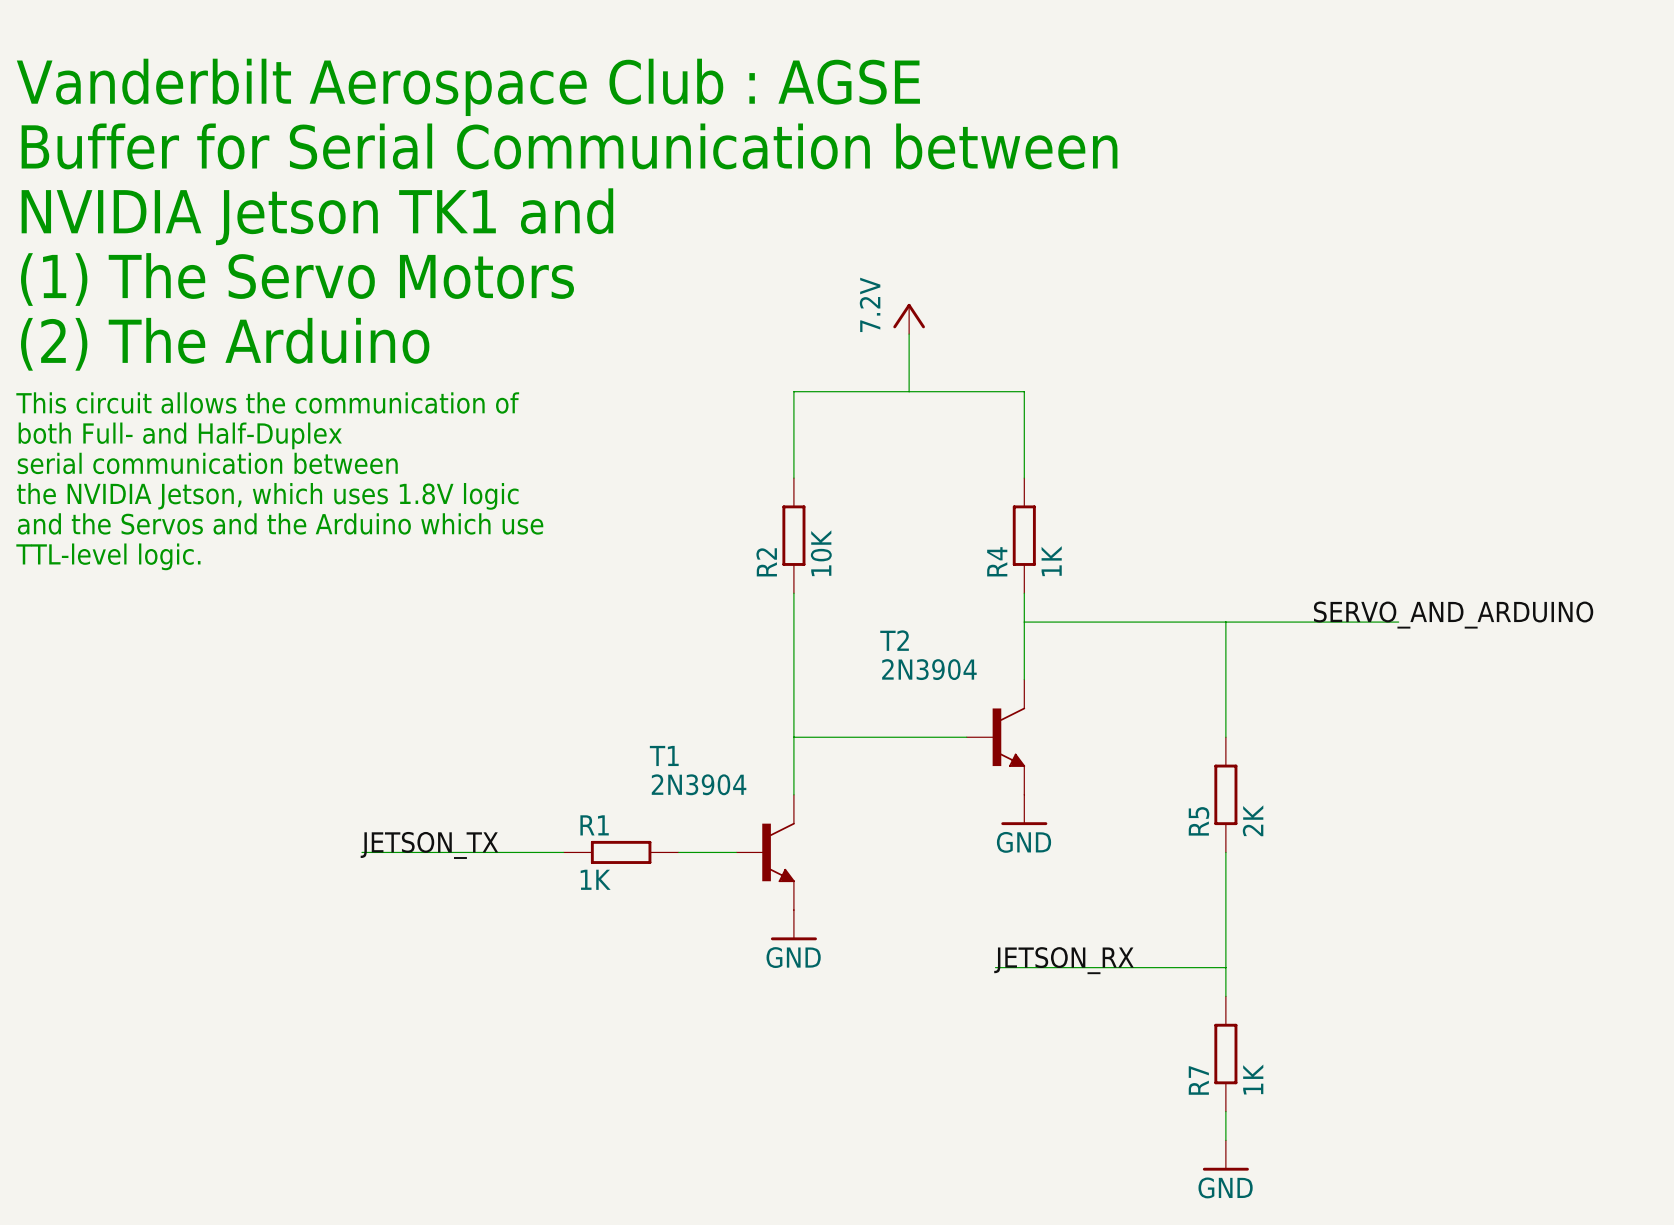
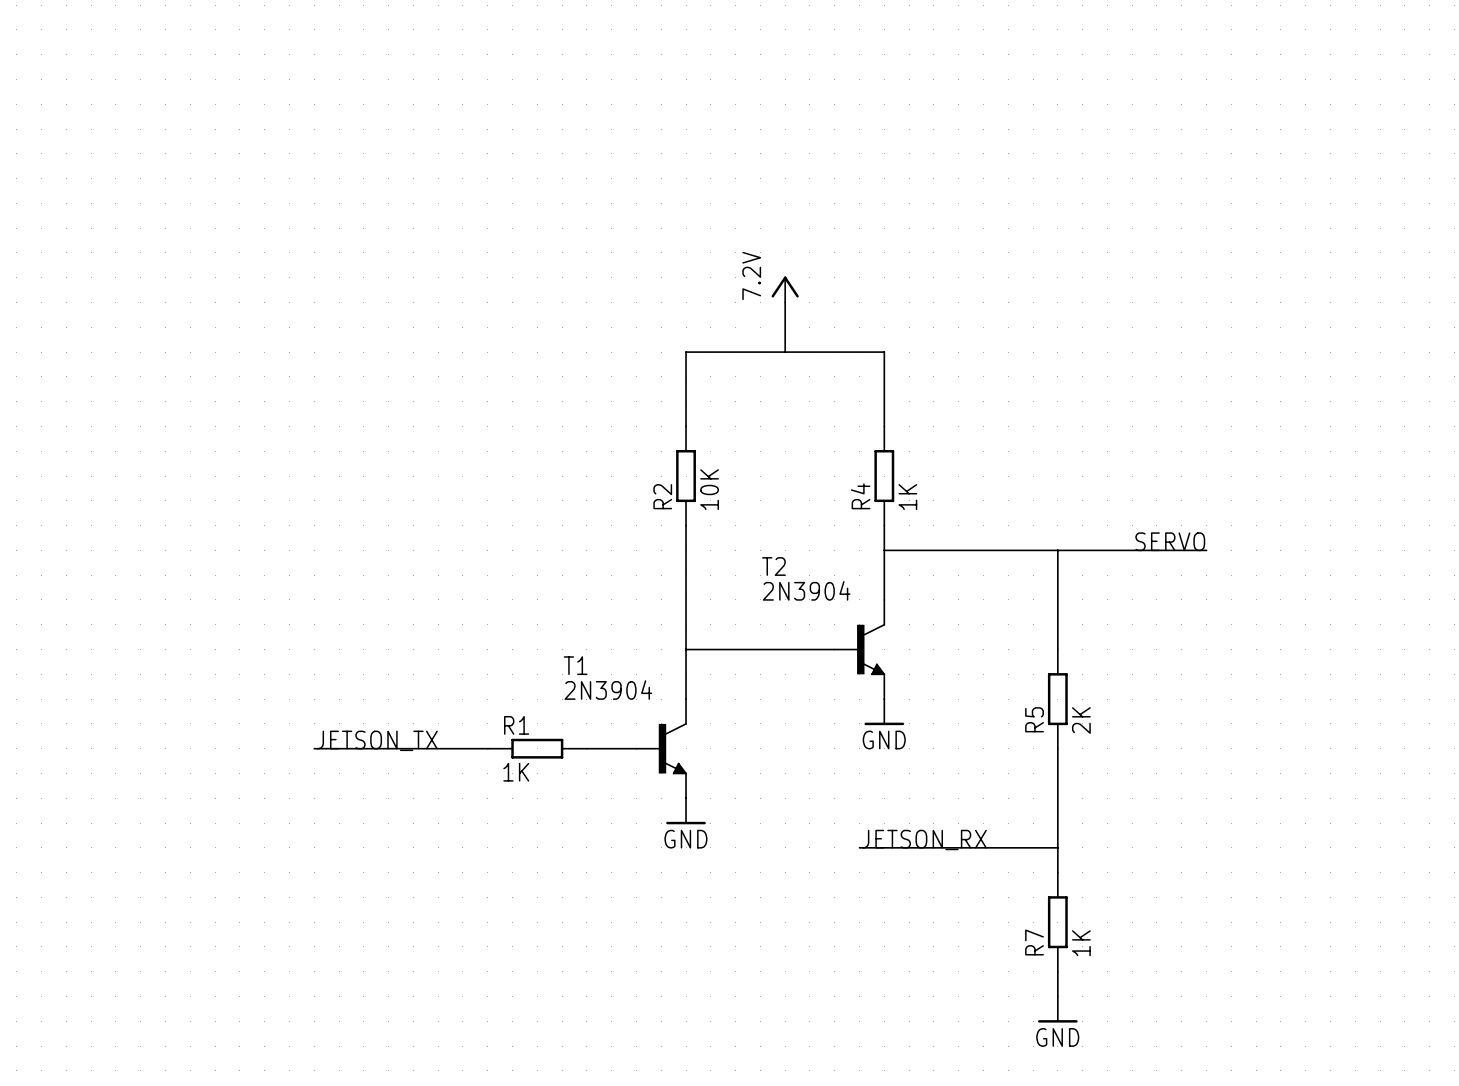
text: Vanderbilt Aerospace Club : AGSE (468, 87) -> none
text: Buffer for Serial Communication between (569, 146) -> none
text: NVIDIA Jetson TK1 and (317, 216) -> none
text: (1) The Servo Motors (297, 279) -> none
text: (2) The Arduino (225, 344) -> none
text: This circuit allows the communication of (267, 402) -> none
text: both Full- and Half-Duplex (180, 435) -> none
text: serial communication between (207, 463) -> none
text: the NVIDIA Jetson, which uses 1.8V logic (267, 496) -> none
text: and the Servos and the Arduino which use (280, 523) -> none
text: TTL-level logic. (108, 556) -> none
label: SERVO_AND_ARDUINO (1453, 615) -> SERVO (1170, 541)

